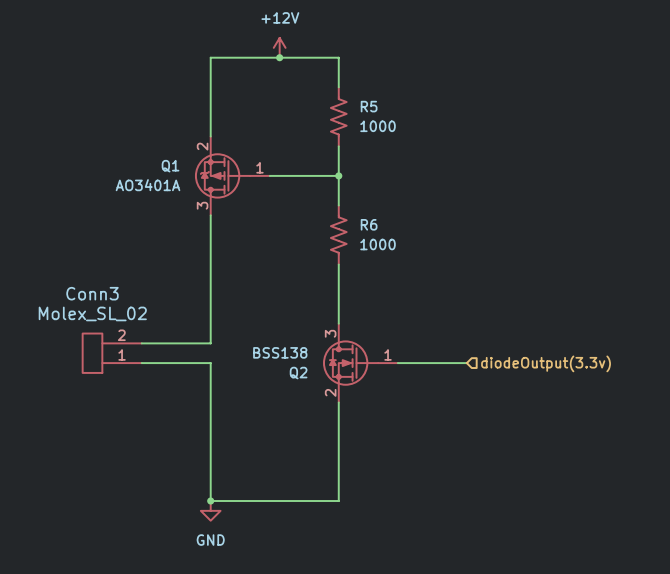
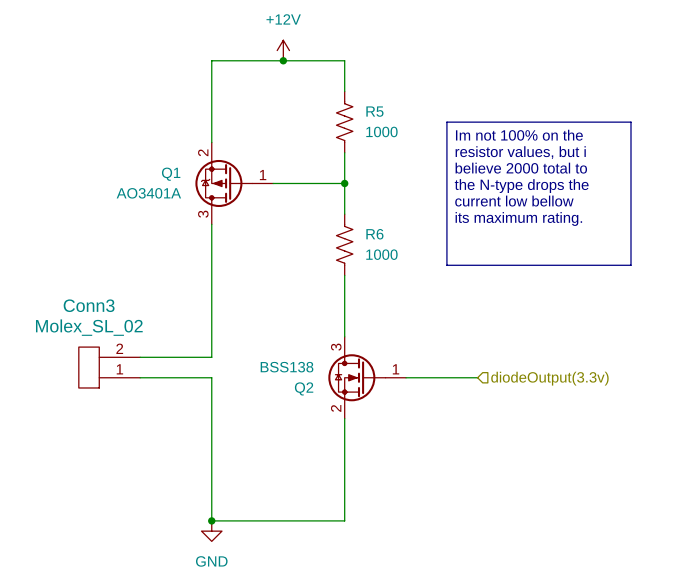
line: none -> (446, 122) (630, 122) (630, 265) (446, 265) (446, 122)
text: none -> Im not 100% on the (519, 135)
text: none -> resistor values, but i (520, 152)
text: none -> believe 2000 total to (521, 168)
text: none -> the N-type drops the (521, 186)
text: none -> current low bellow (514, 201)
text: none -> its maximum rating. (518, 218)

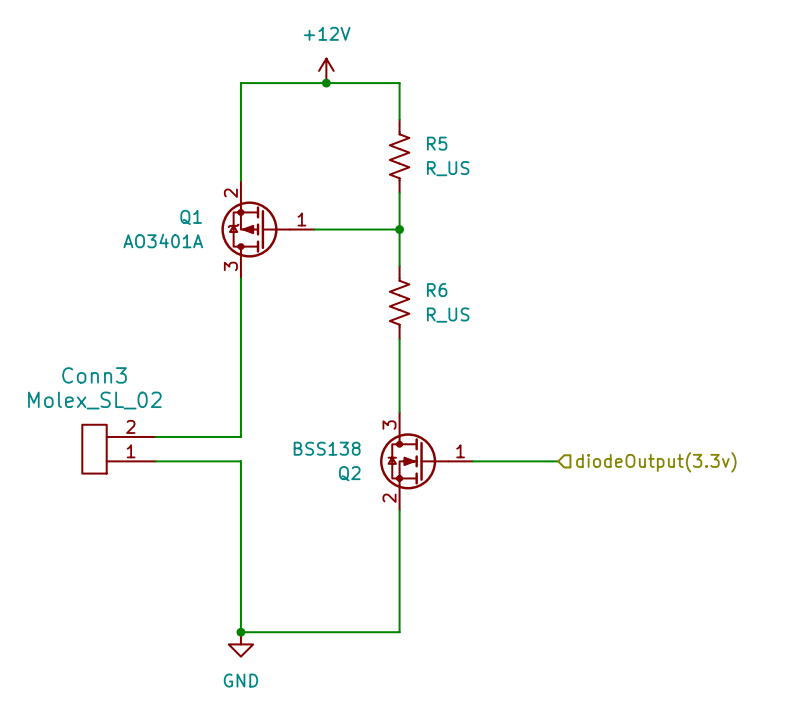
line: (446, 122) (630, 122) (630, 265) (446, 265) (446, 122) -> none
R5 value: 1000 (381, 131) -> R_US (448, 168)
text: Im not 100% on the (519, 135) -> none
text: resistor values, but i (520, 152) -> none
text: believe 2000 total to (521, 168) -> none
text: the N-type drops the (521, 186) -> none
text: current low bellow (514, 201) -> none
text: its maximum rating. (518, 218) -> none
R6 value: 1000 (381, 254) -> R_US (448, 315)

